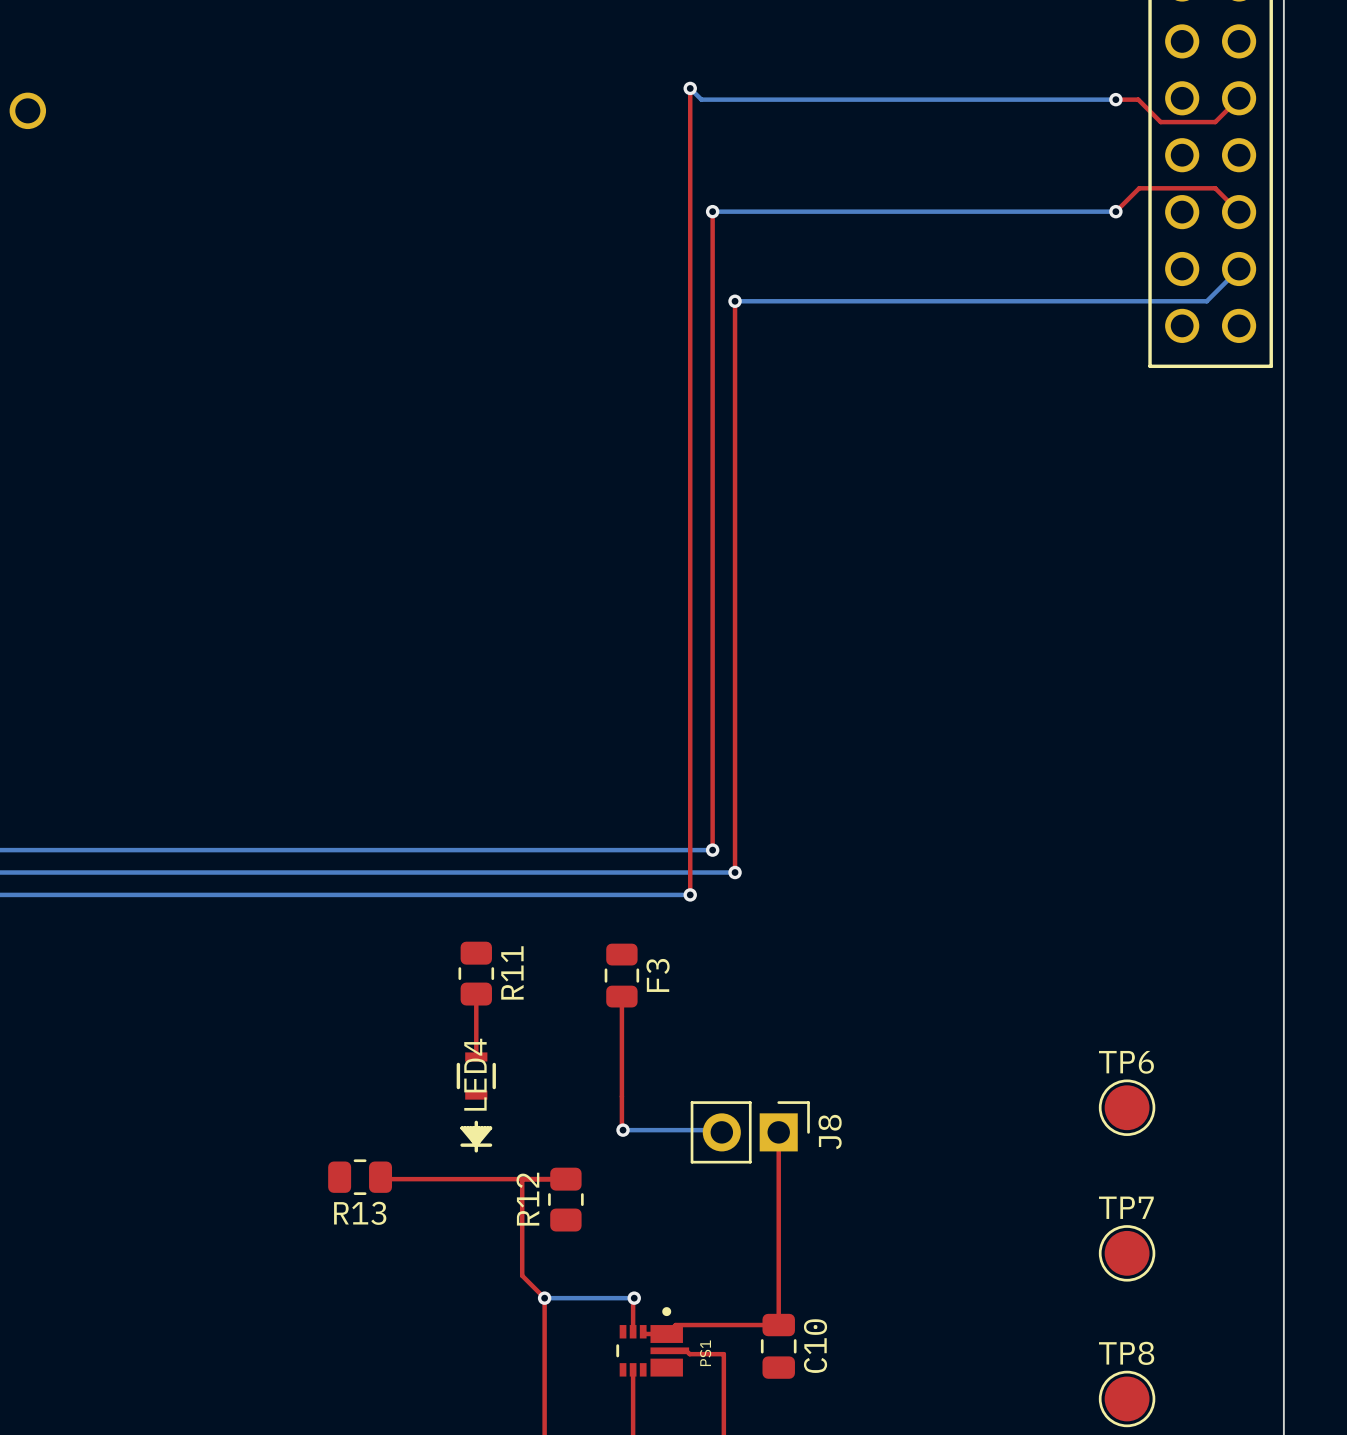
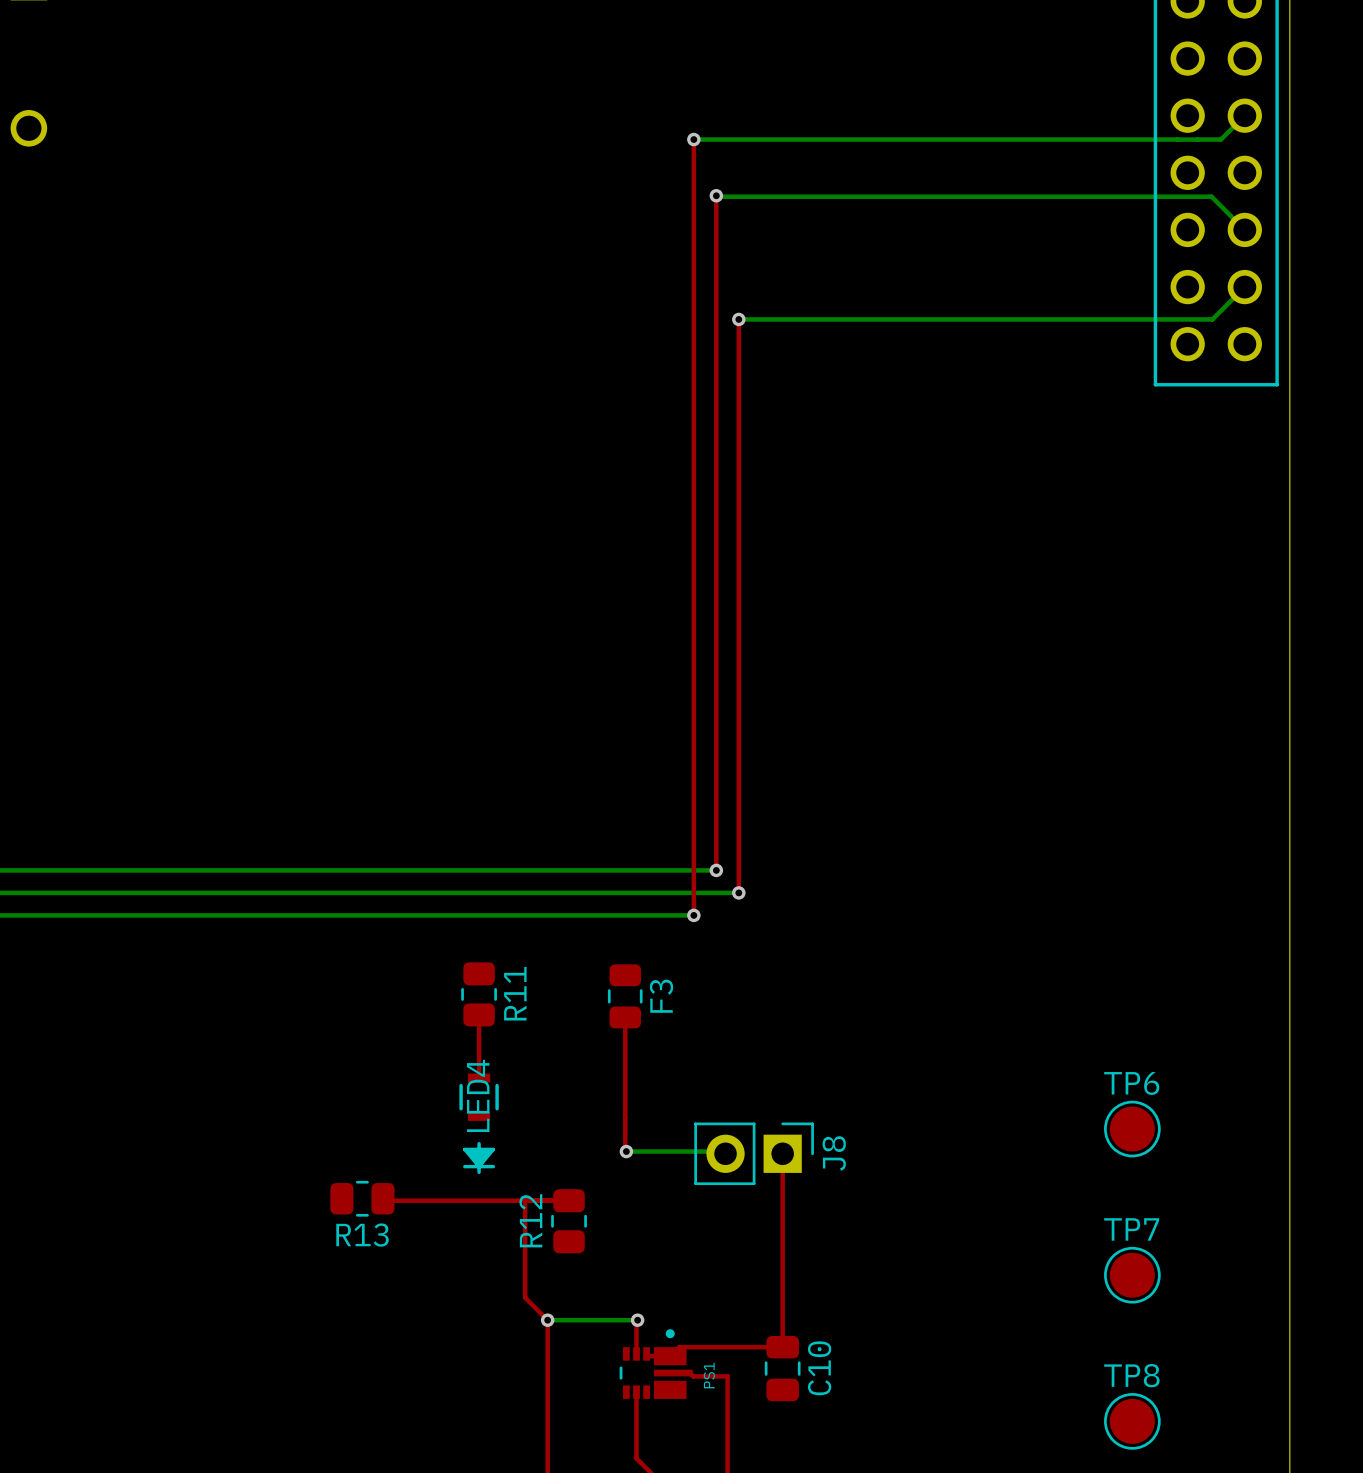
top track: (690, 88) (690, 122) -> (716, 195) (716, 229)
bottom track: (690, 88) (701, 99) (1115, 99) -> none
via position: (690, 88) -> (693, 139)
top track: (1239, 98) (1215, 122) (1160, 122) (1138, 99) (1115, 99) -> none
bottom track: none -> (1244, 115) (1220, 139) (693, 139)
via: (1115, 99) -> none
bottom track: none -> (716, 195) (1211, 196) (1244, 229)
bottom track: (712, 211) (1115, 211) -> none
via position: (712, 211) -> (716, 195)
top track: (1115, 211) (1139, 188) (1215, 188) (1239, 212) -> none
via: (1115, 211) -> none

